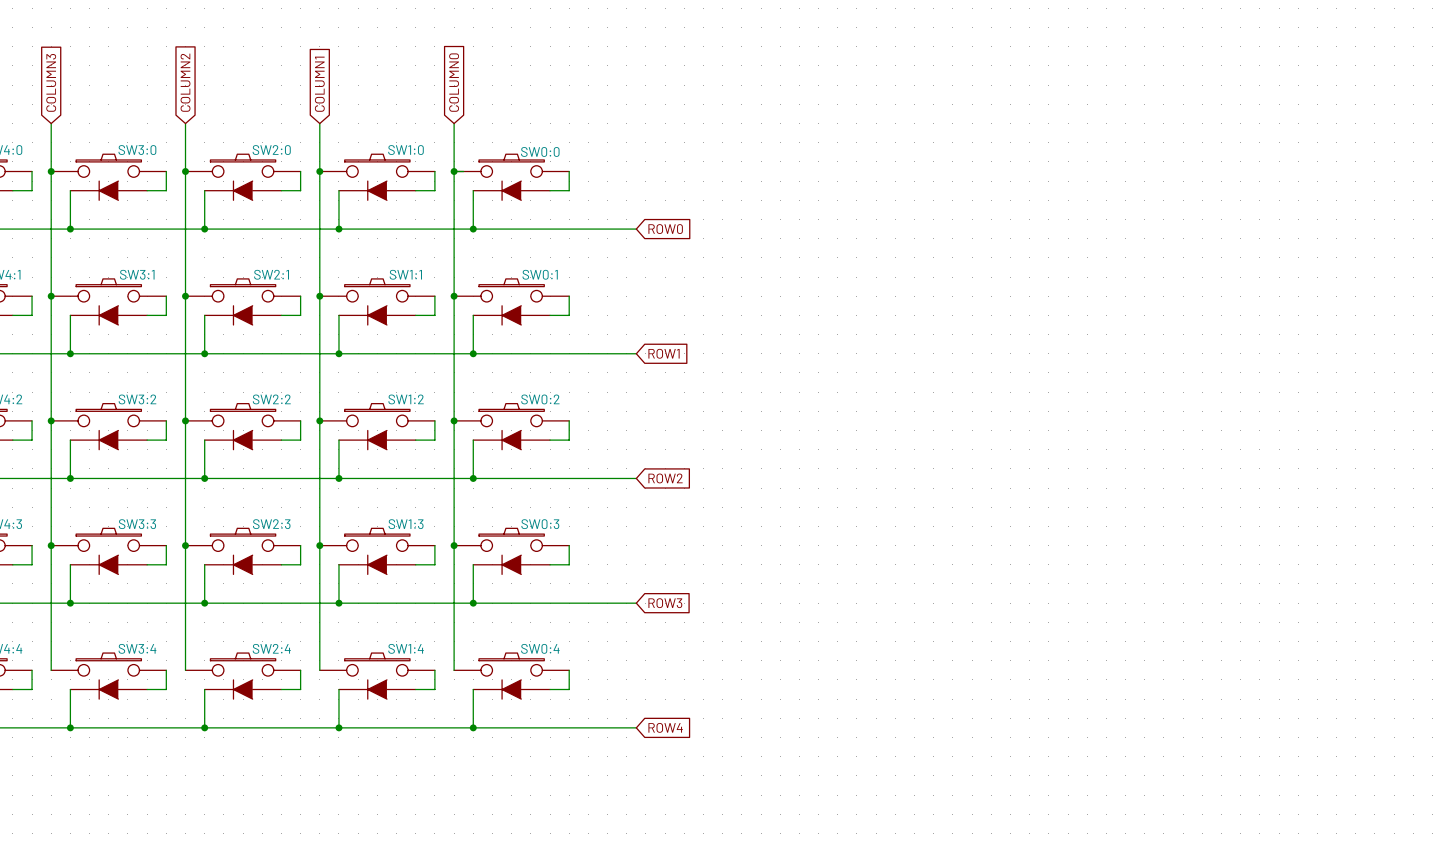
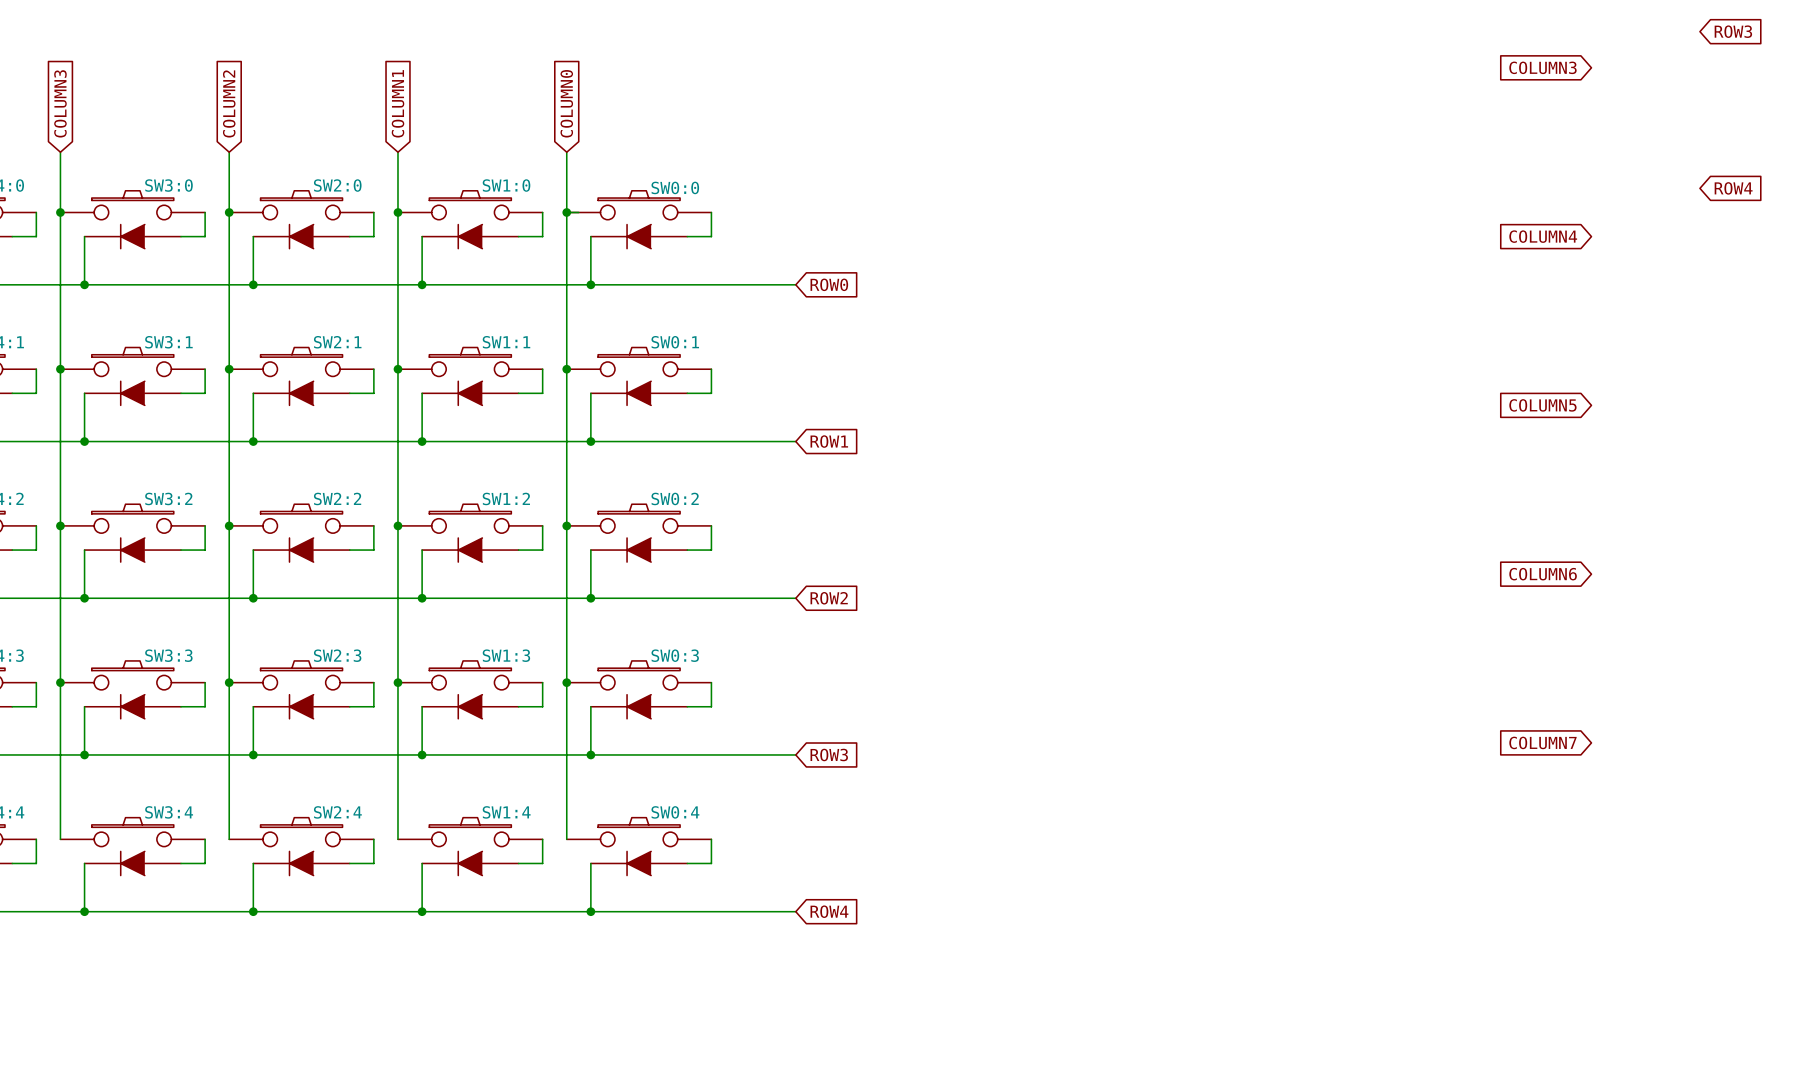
global label: none -> ROW3 (1733, 31)
global label: none -> COLUMN3 (1542, 67)
global label: none -> ROW4 (1733, 188)
global label: none -> COLUMN4 (1543, 236)
global label: none -> COLUMN5 (1542, 405)
global label: none -> COLUMN6 (1543, 574)
global label: none -> COLUMN7 (1542, 742)

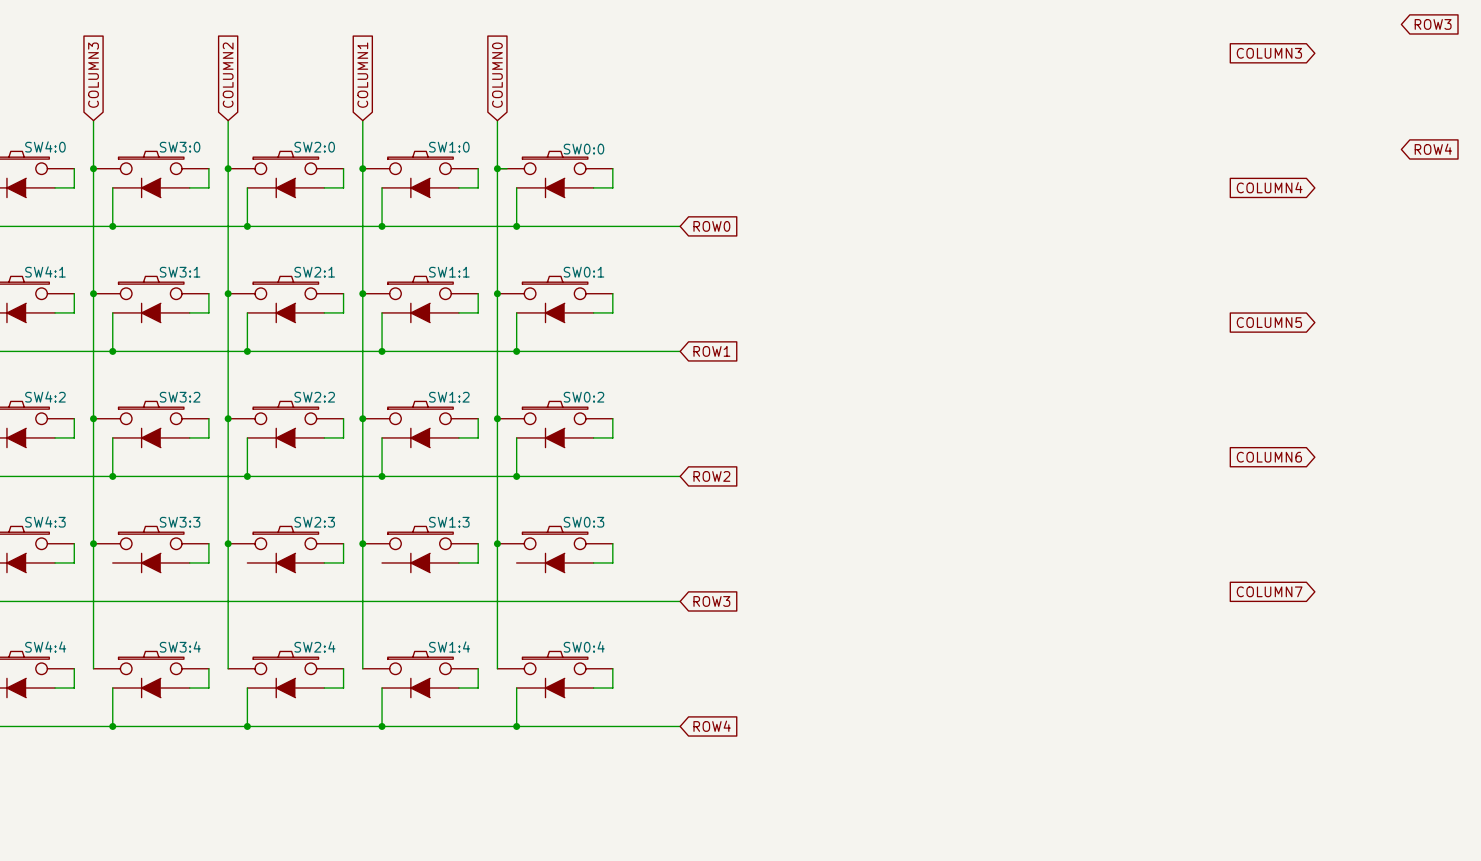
wire: (84, 706) (84, 754) -> none
wire: (253, 706) (253, 754) -> none
wire: (422, 706) (422, 754) -> none
wire: (590, 706) (590, 754) -> none
junction: (84, 754) -> none
junction: (253, 754) -> none
junction: (422, 754) -> none
junction: (590, 754) -> none

